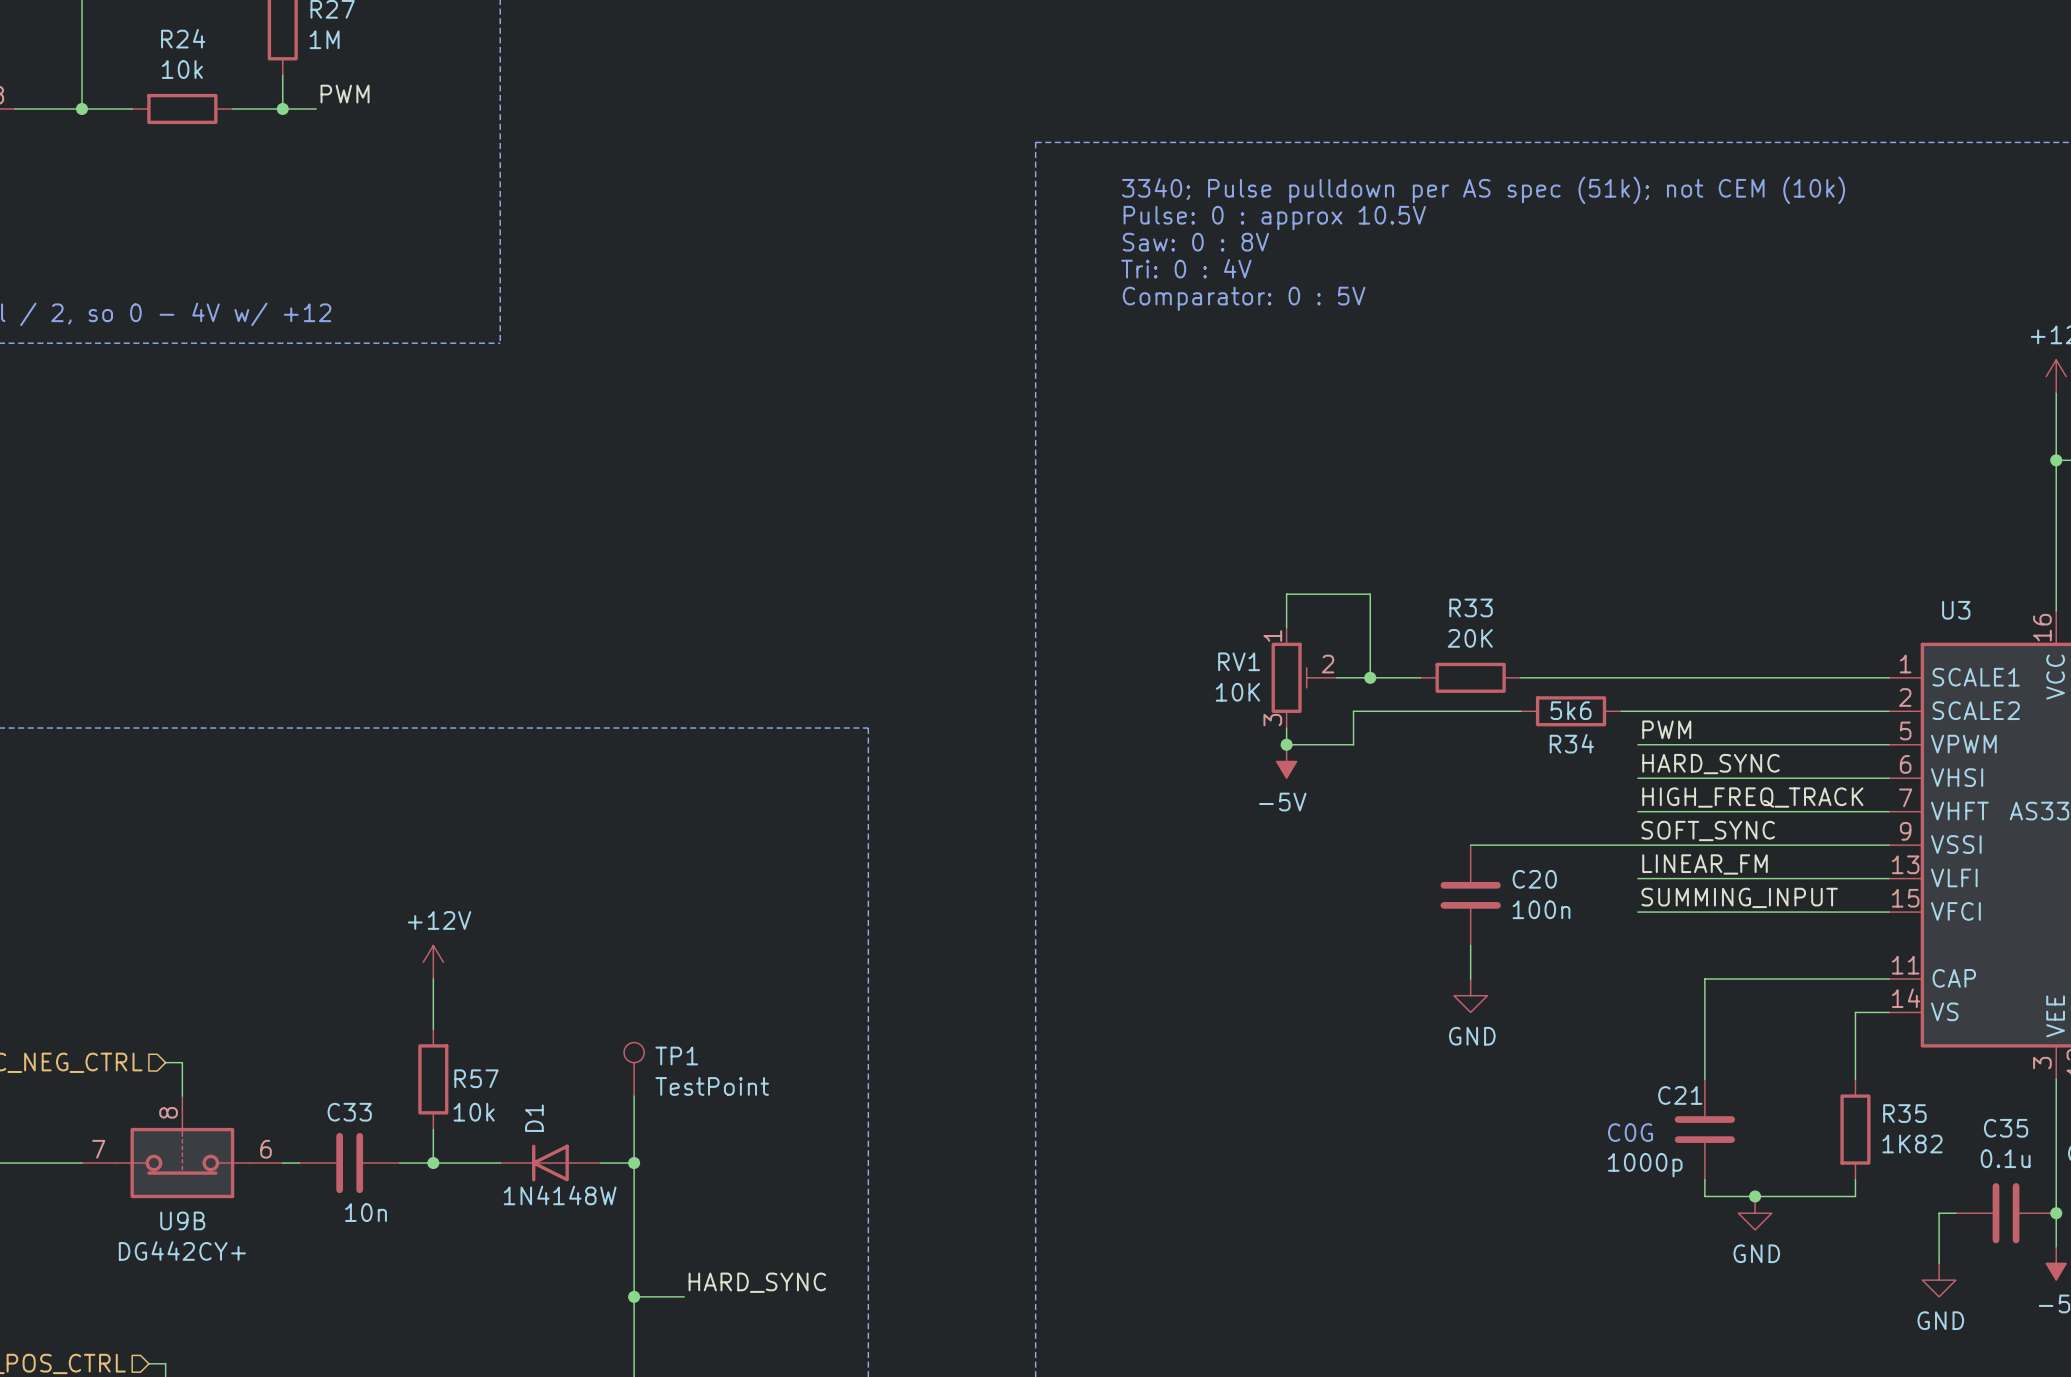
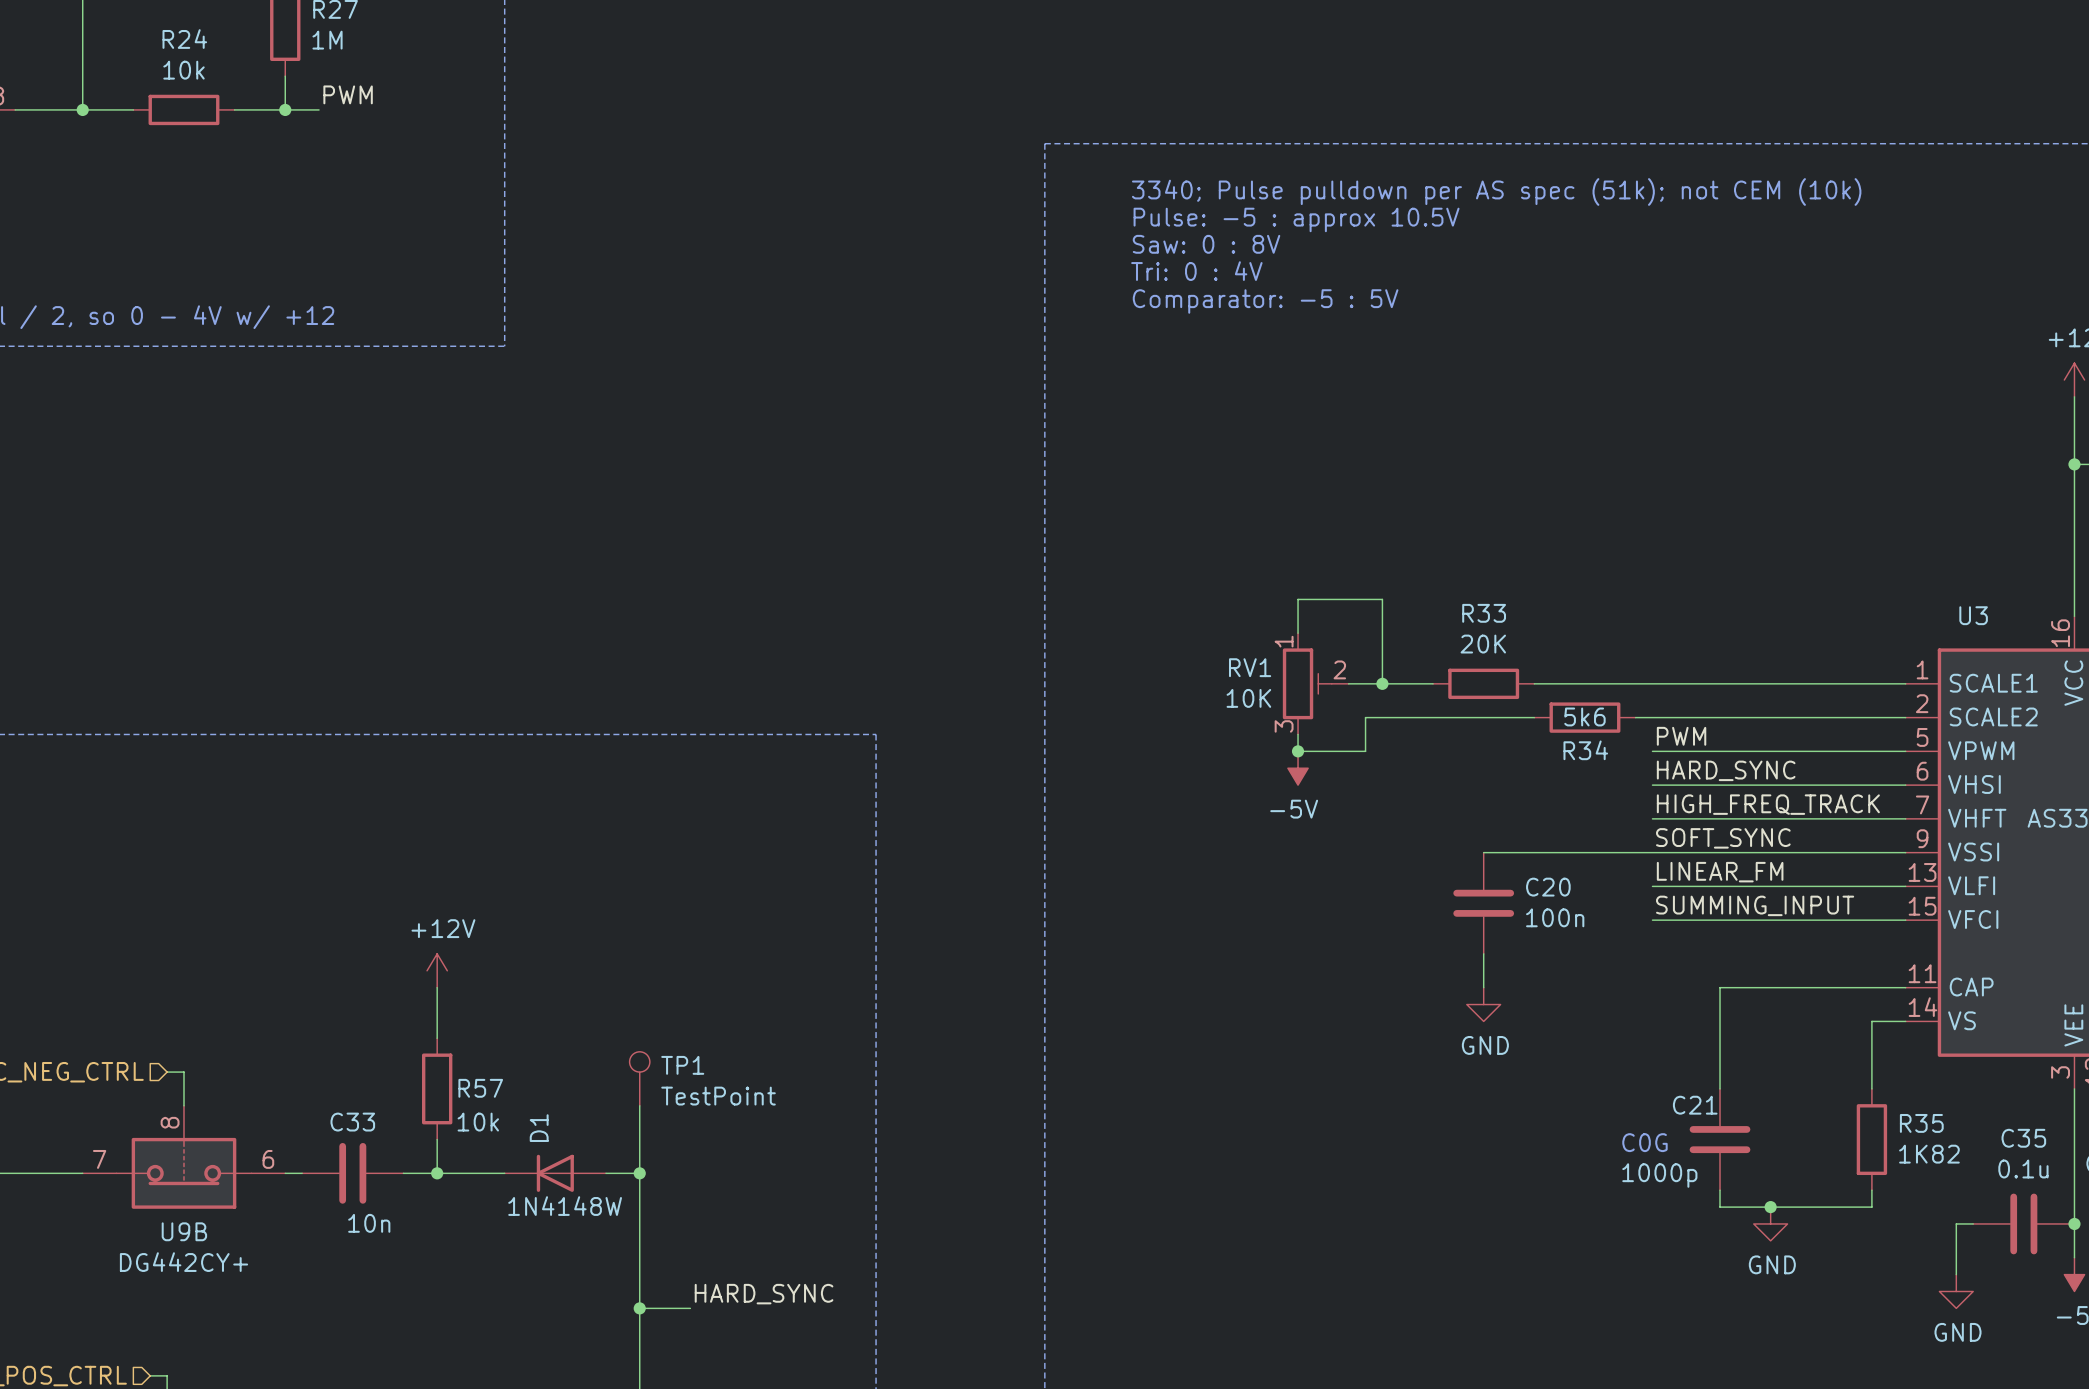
text: Pulse: 0 : approx 10.5V (1274, 218) -> Pulse: -5 : approx 10.5V (1296, 219)
text: Comparator: 0 : 5V (1244, 298) -> Comparator: -5 : 5V (1265, 301)

